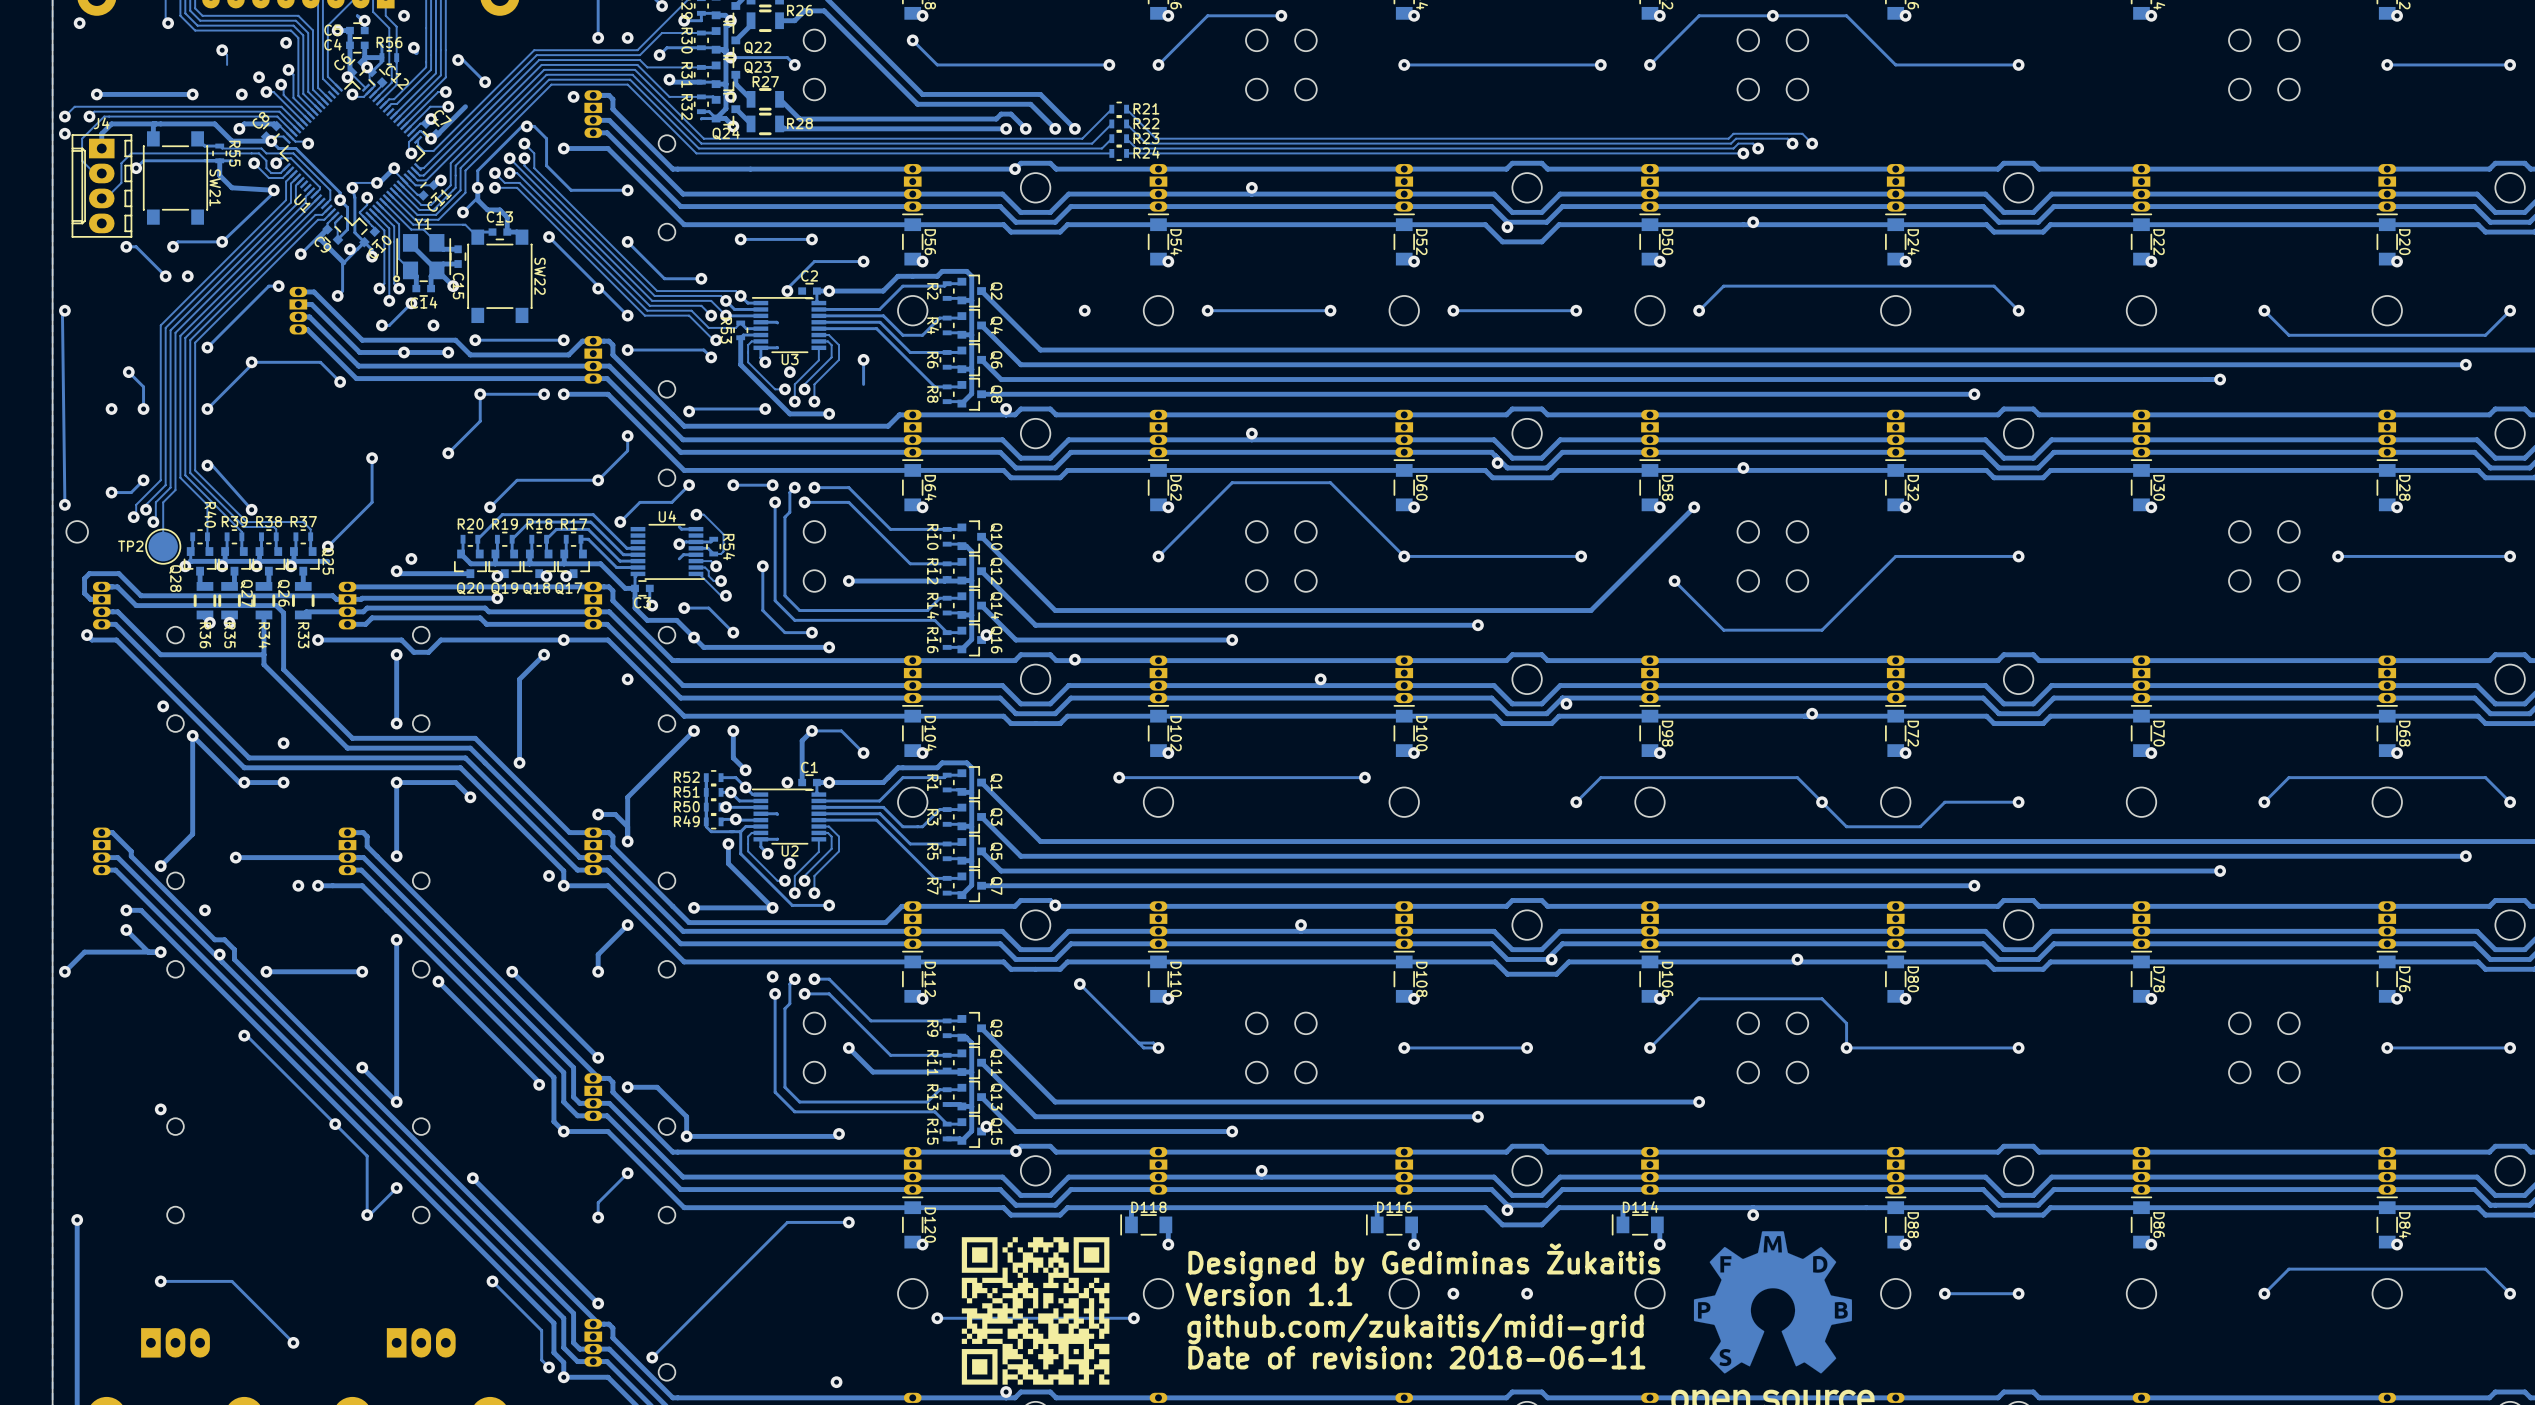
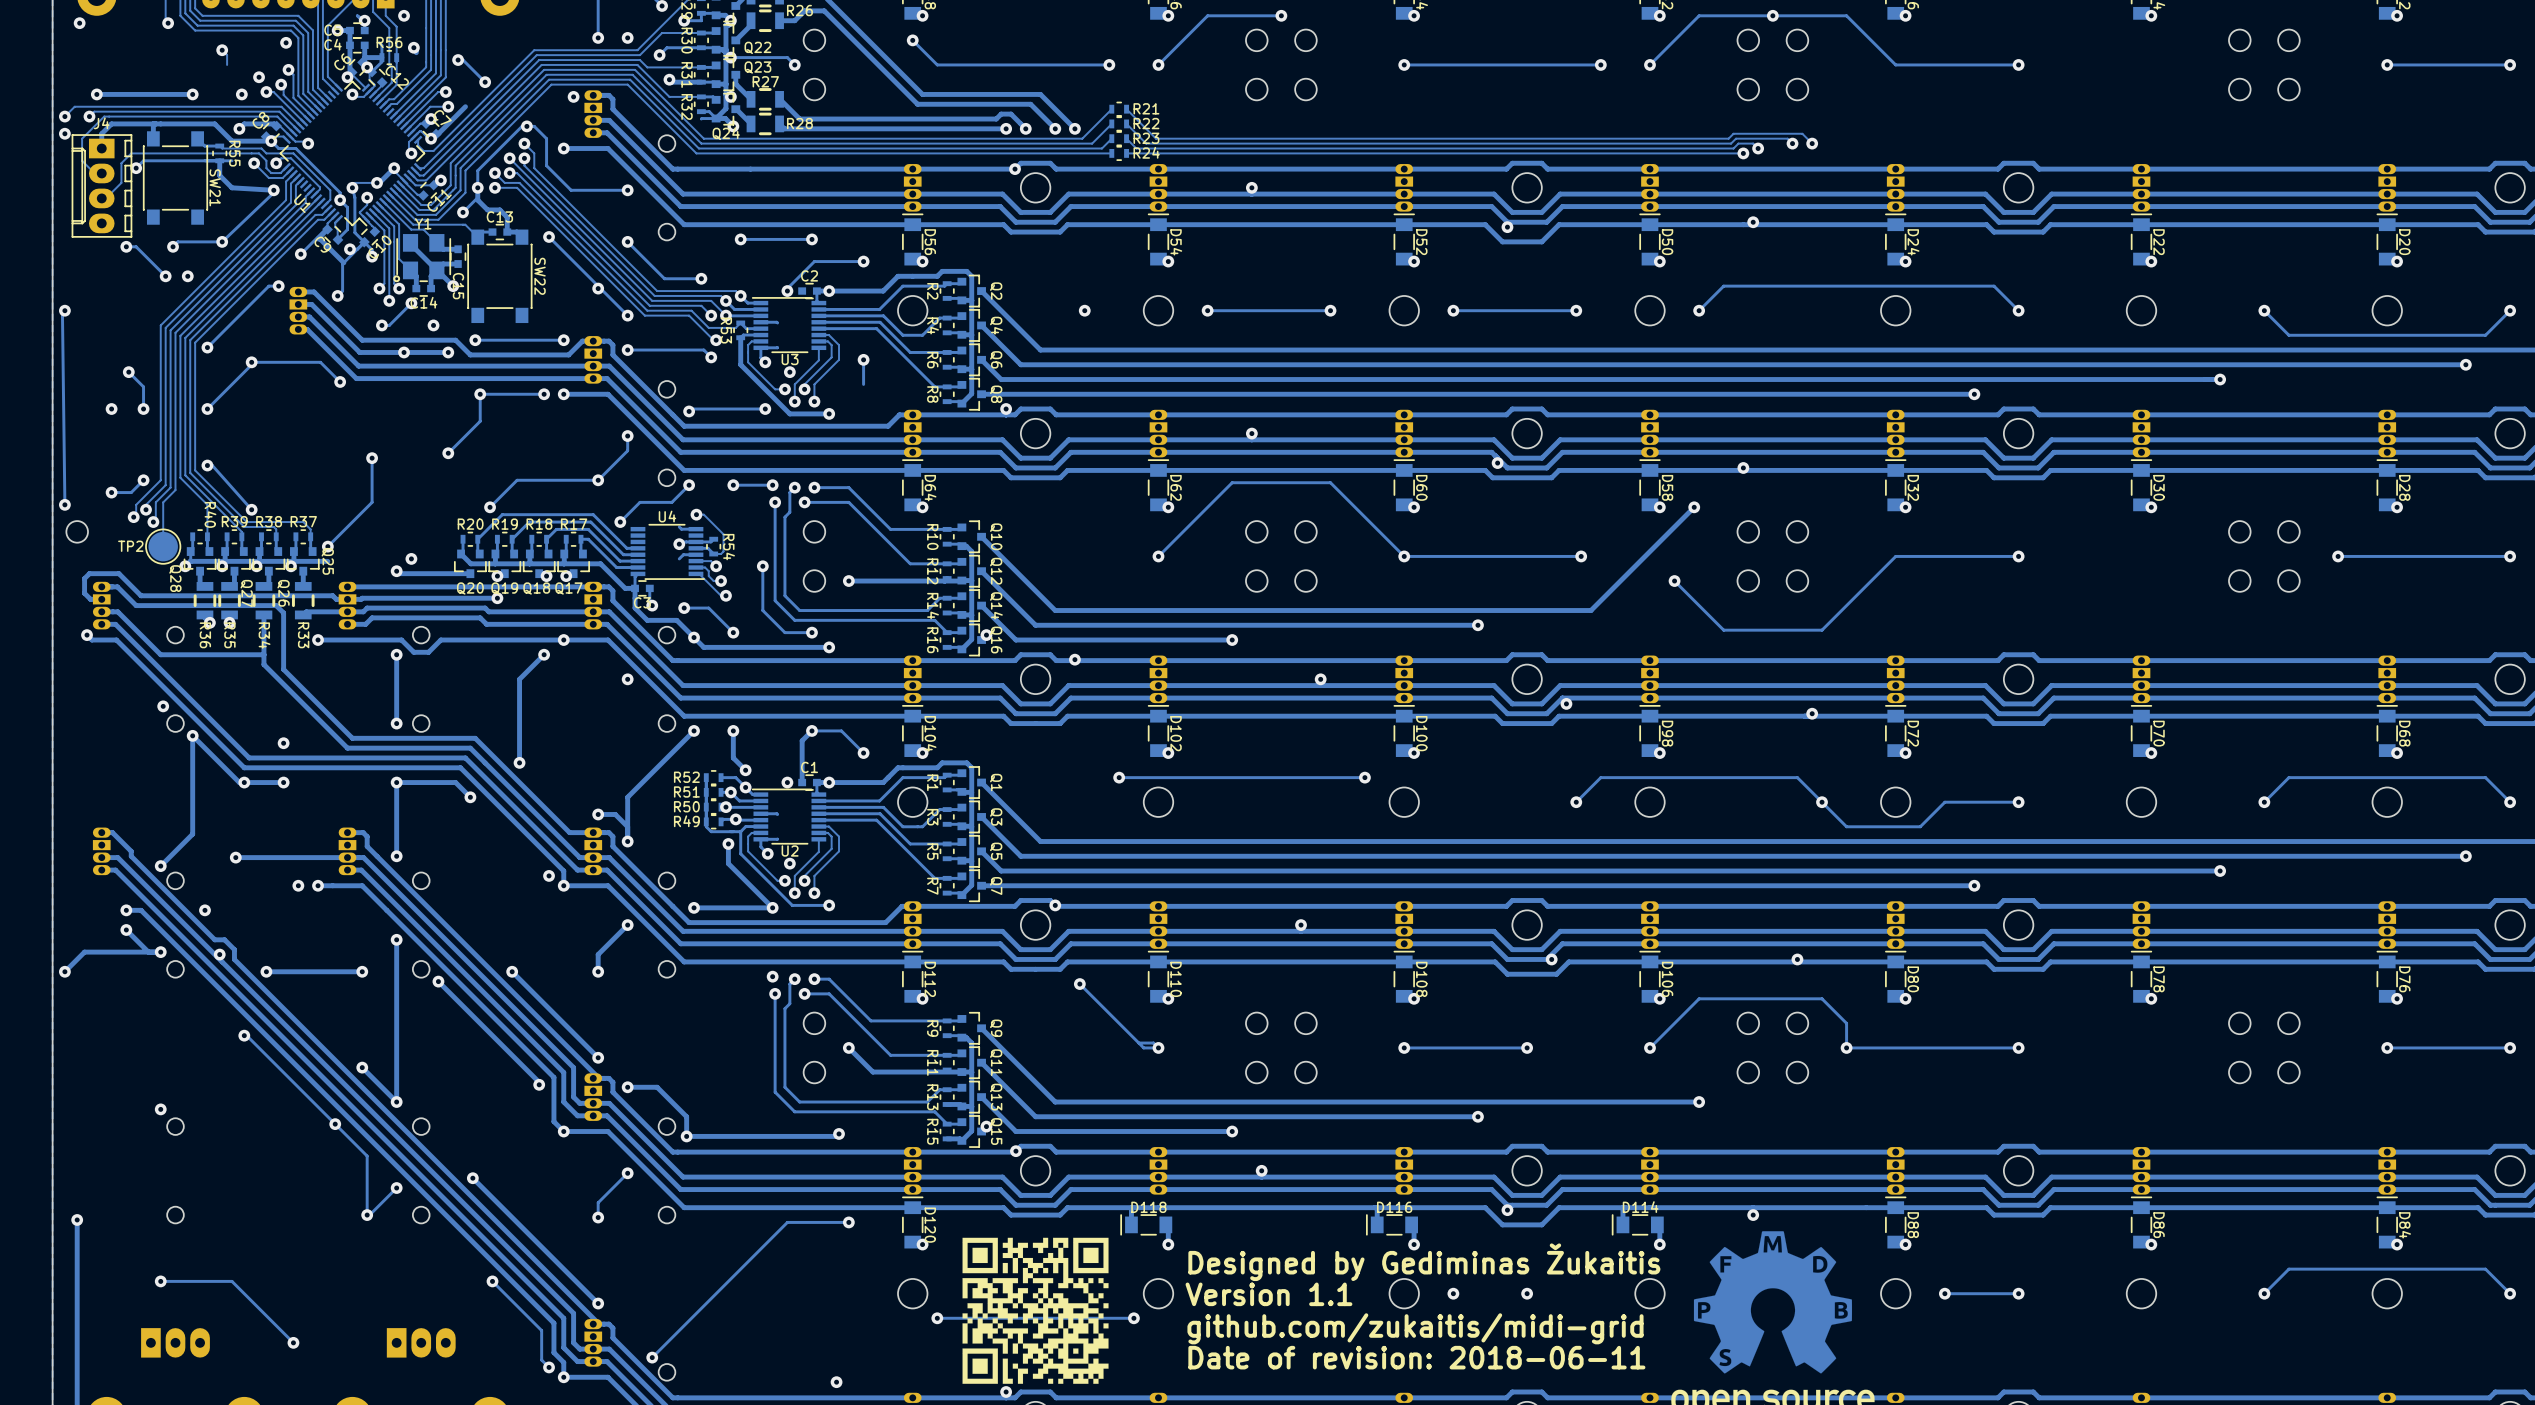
drawing shape: [961, 1237, 1110, 1385] -> [962, 1237, 1109, 1384]

